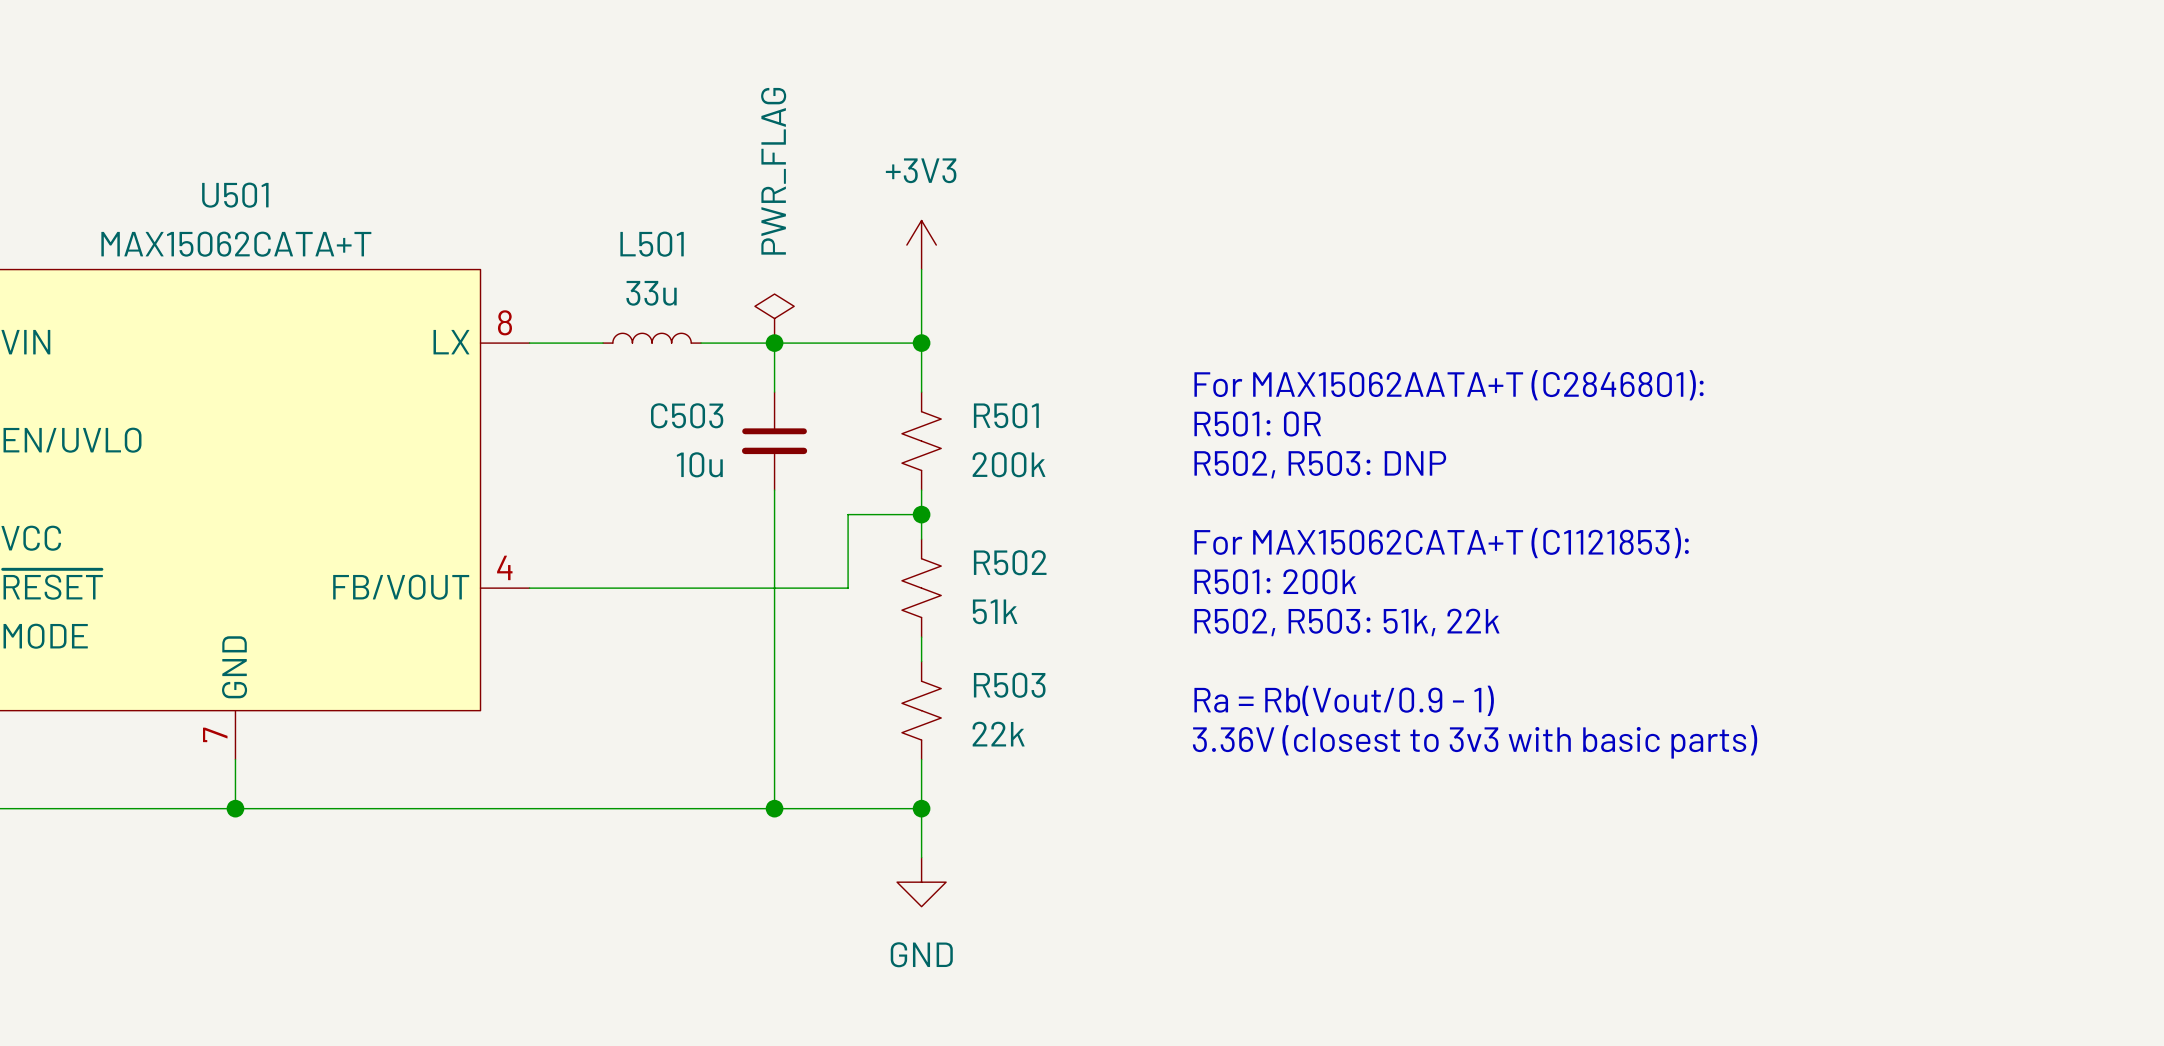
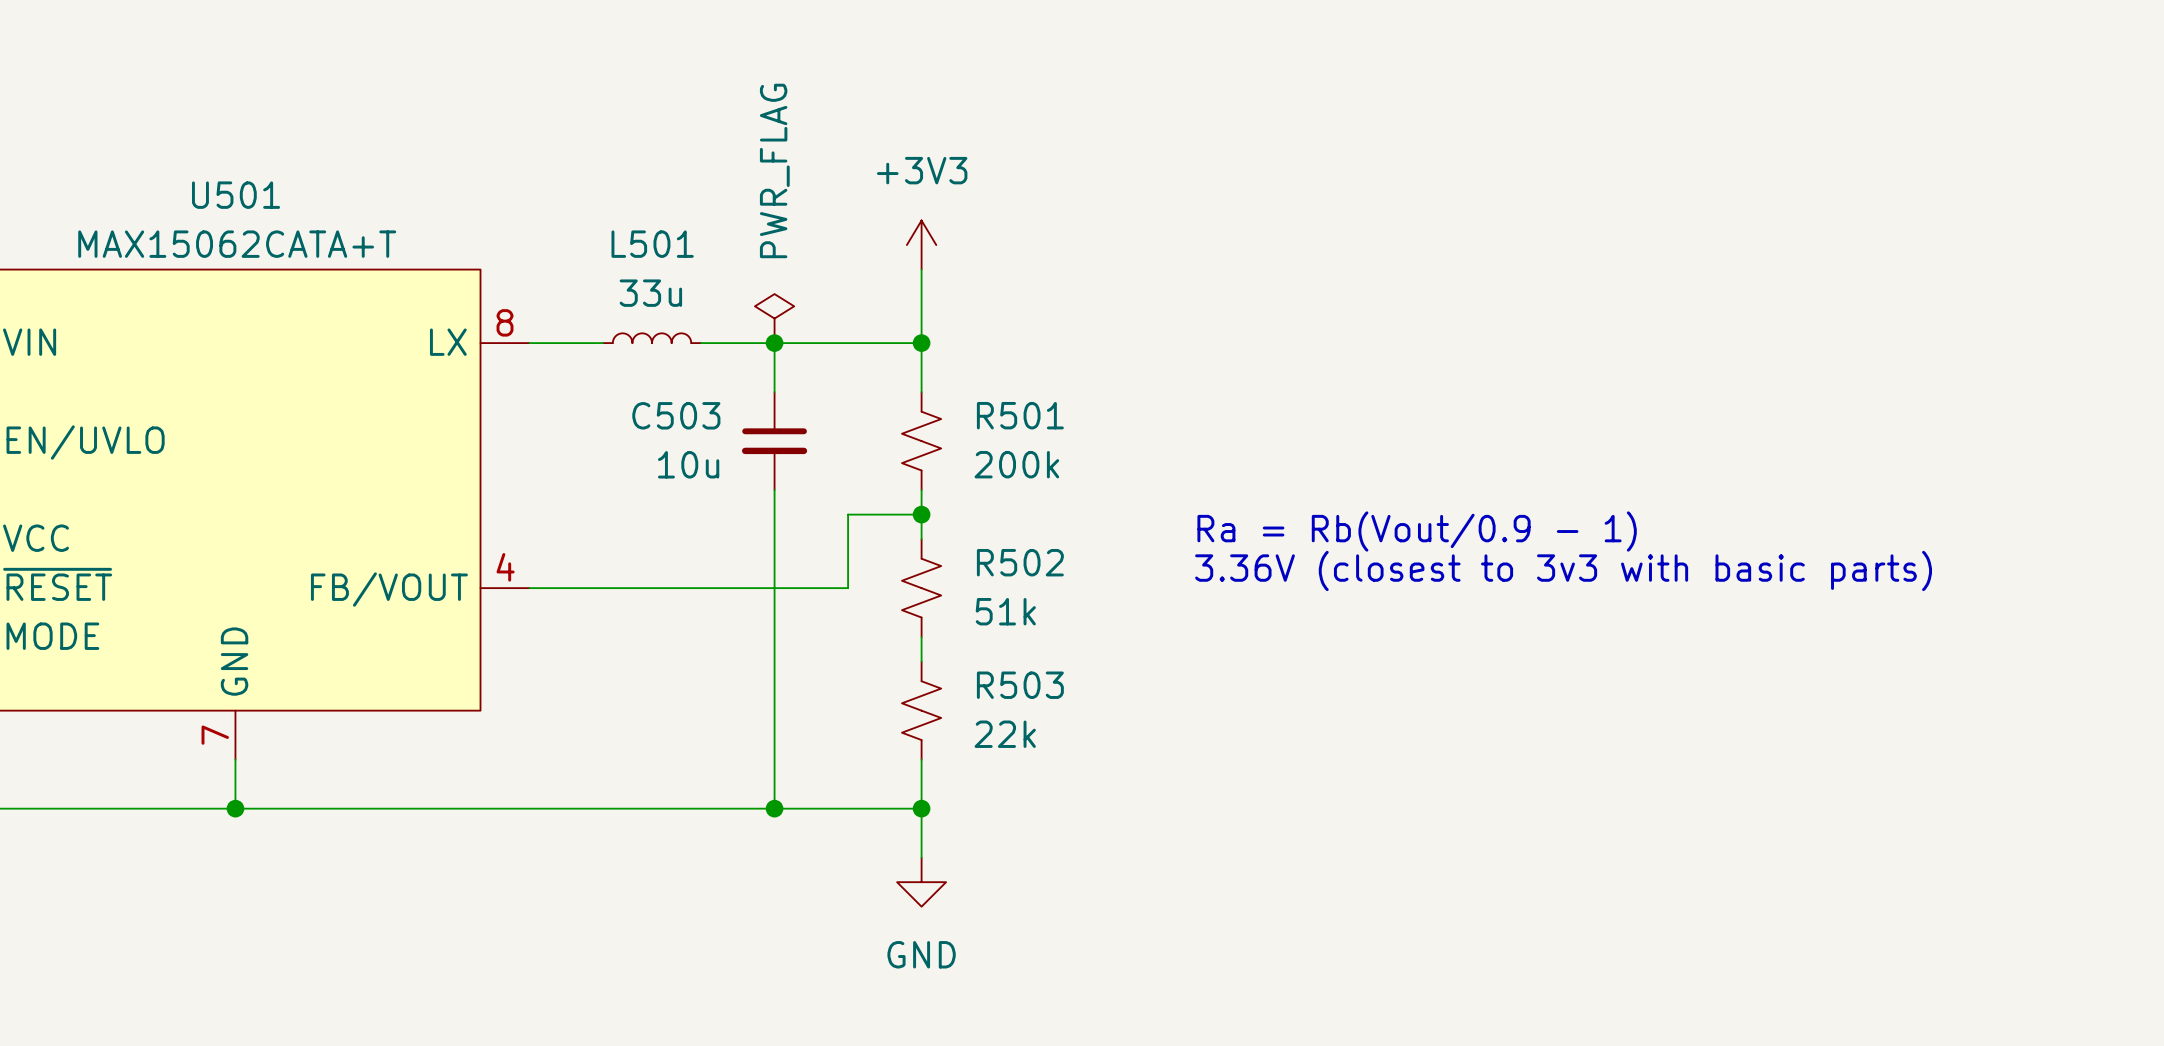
text: For MAX15062AATA+T (C2846801): (1449, 385) -> none
text: R501: 0R (1257, 423) -> none
text: R502, R503: DNP (1320, 464) -> none
text: For MAX15062CATA+T (C1121853): (1441, 543) -> none
text: R501: 200k (1275, 581) -> none
text: R502, R503: 51k, 22k (1346, 622) -> none
text position: Ra = Rb(Vout/0.9 - 1) (1344, 700) -> Ra = Rb(Vout/0.9 - 1) (1417, 531)
text position: 3.36V (closest to 3v3 with basic parts) (1475, 741) -> 3.36V (closest to 3v3 with basic parts) (1563, 570)

